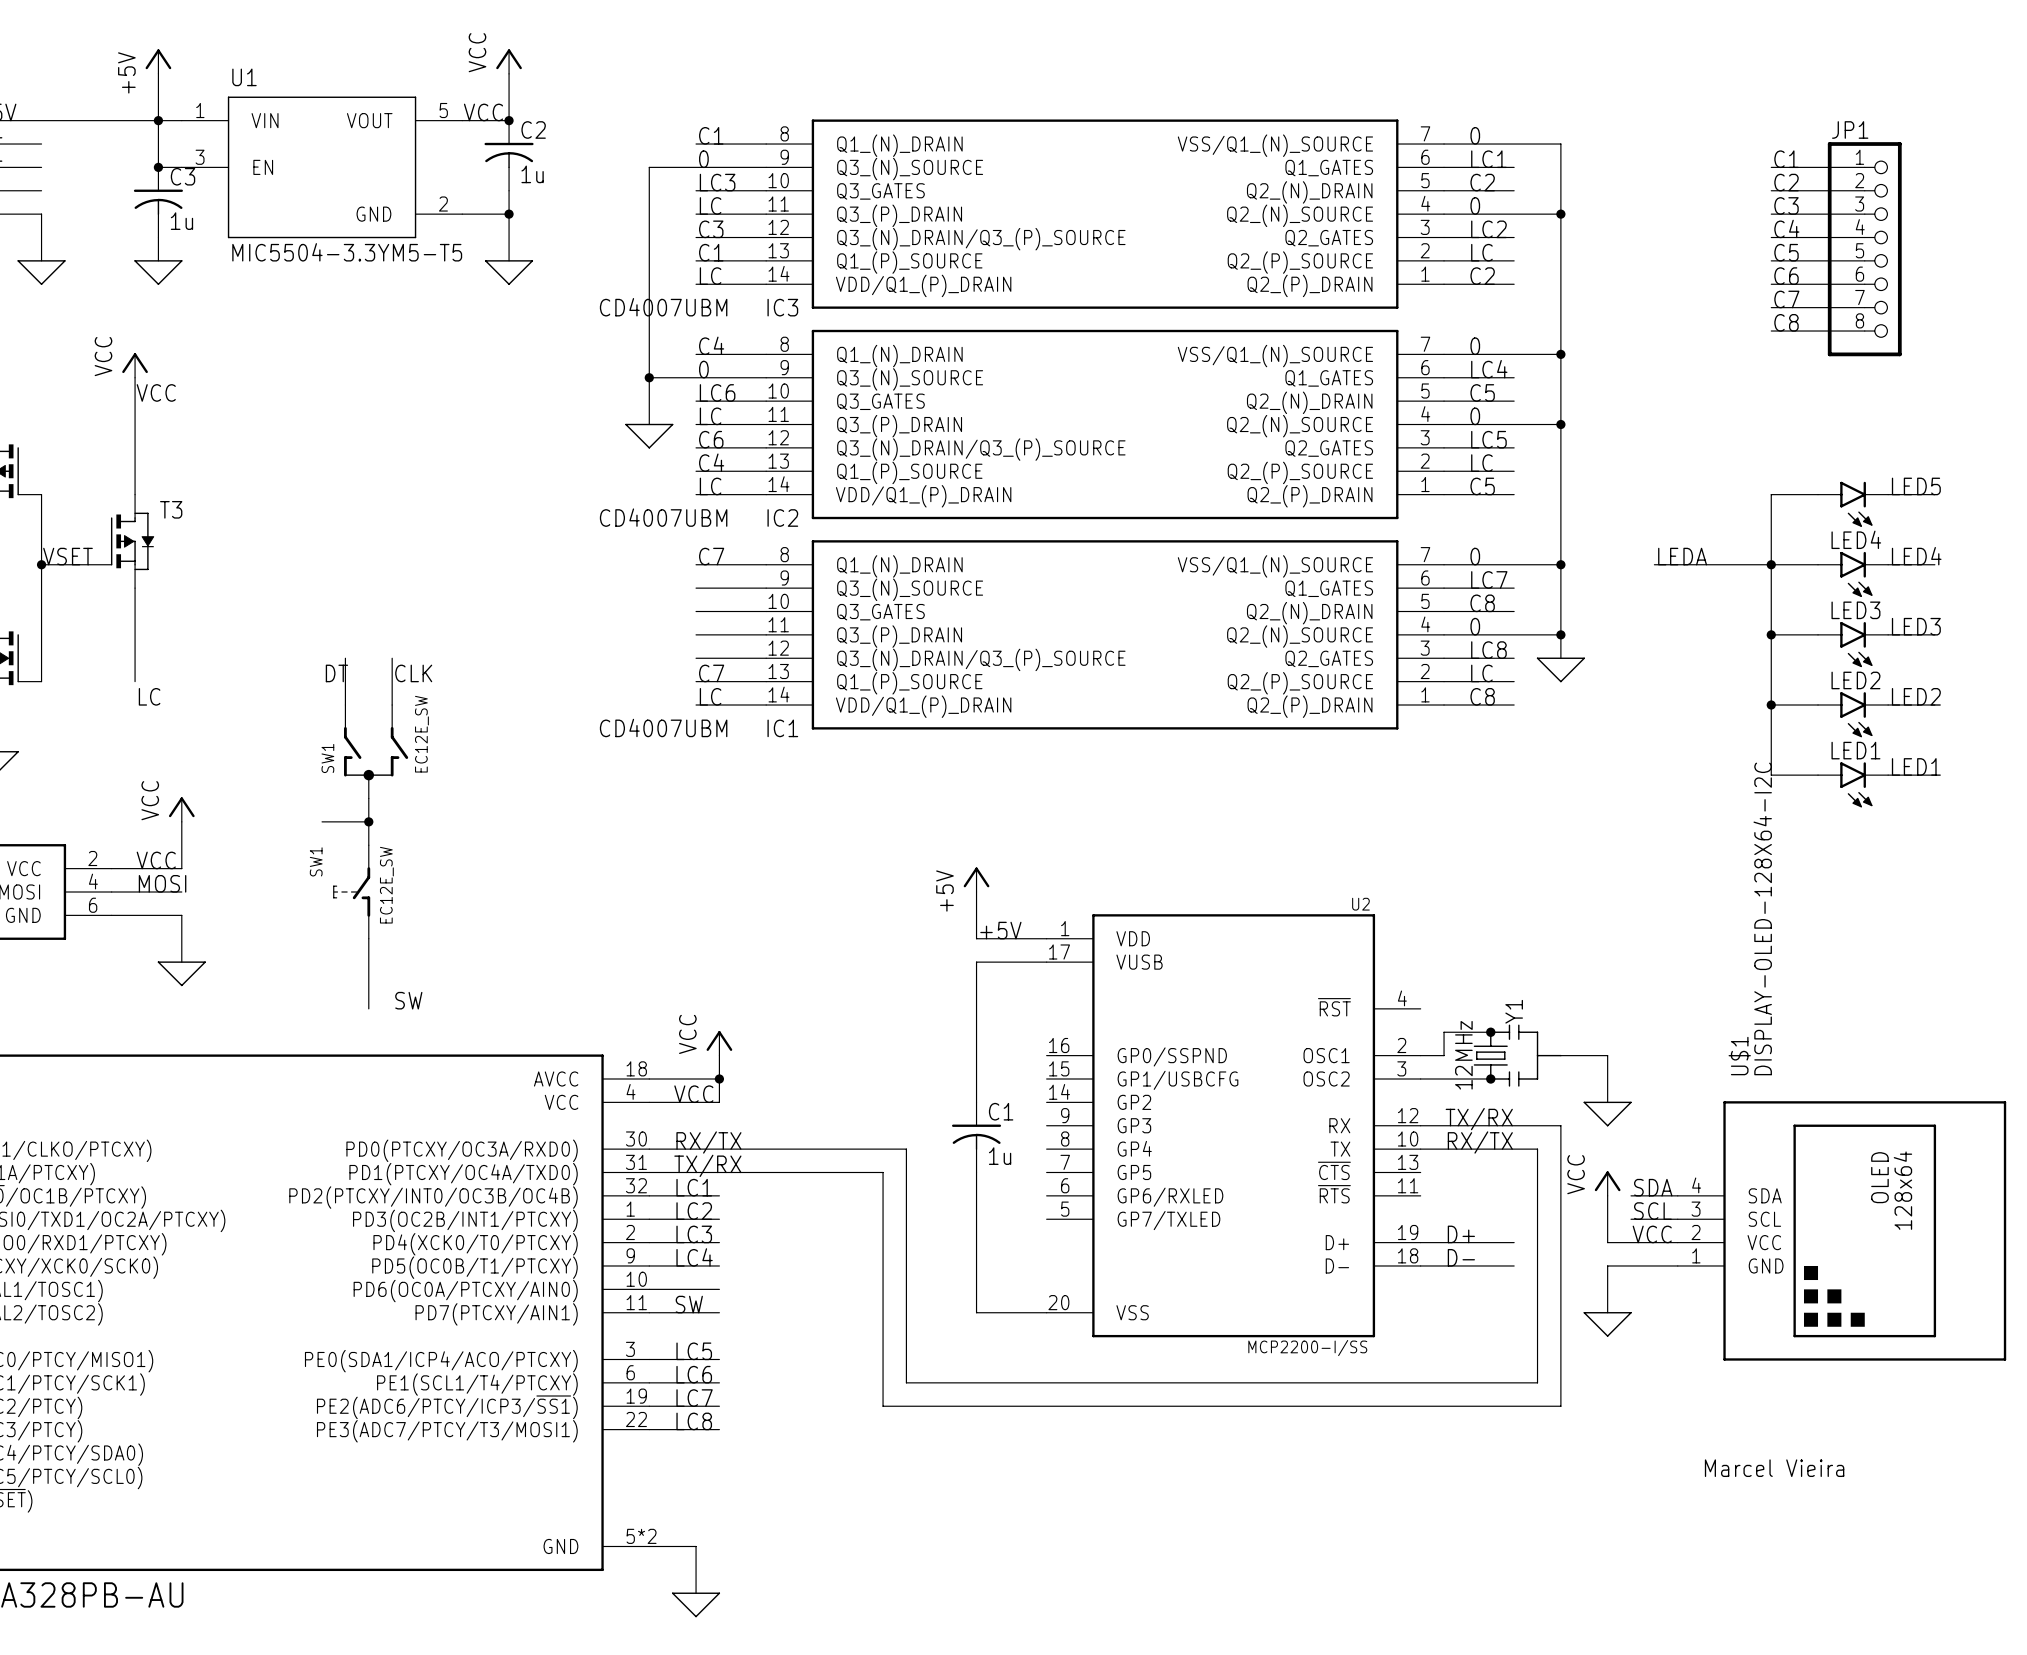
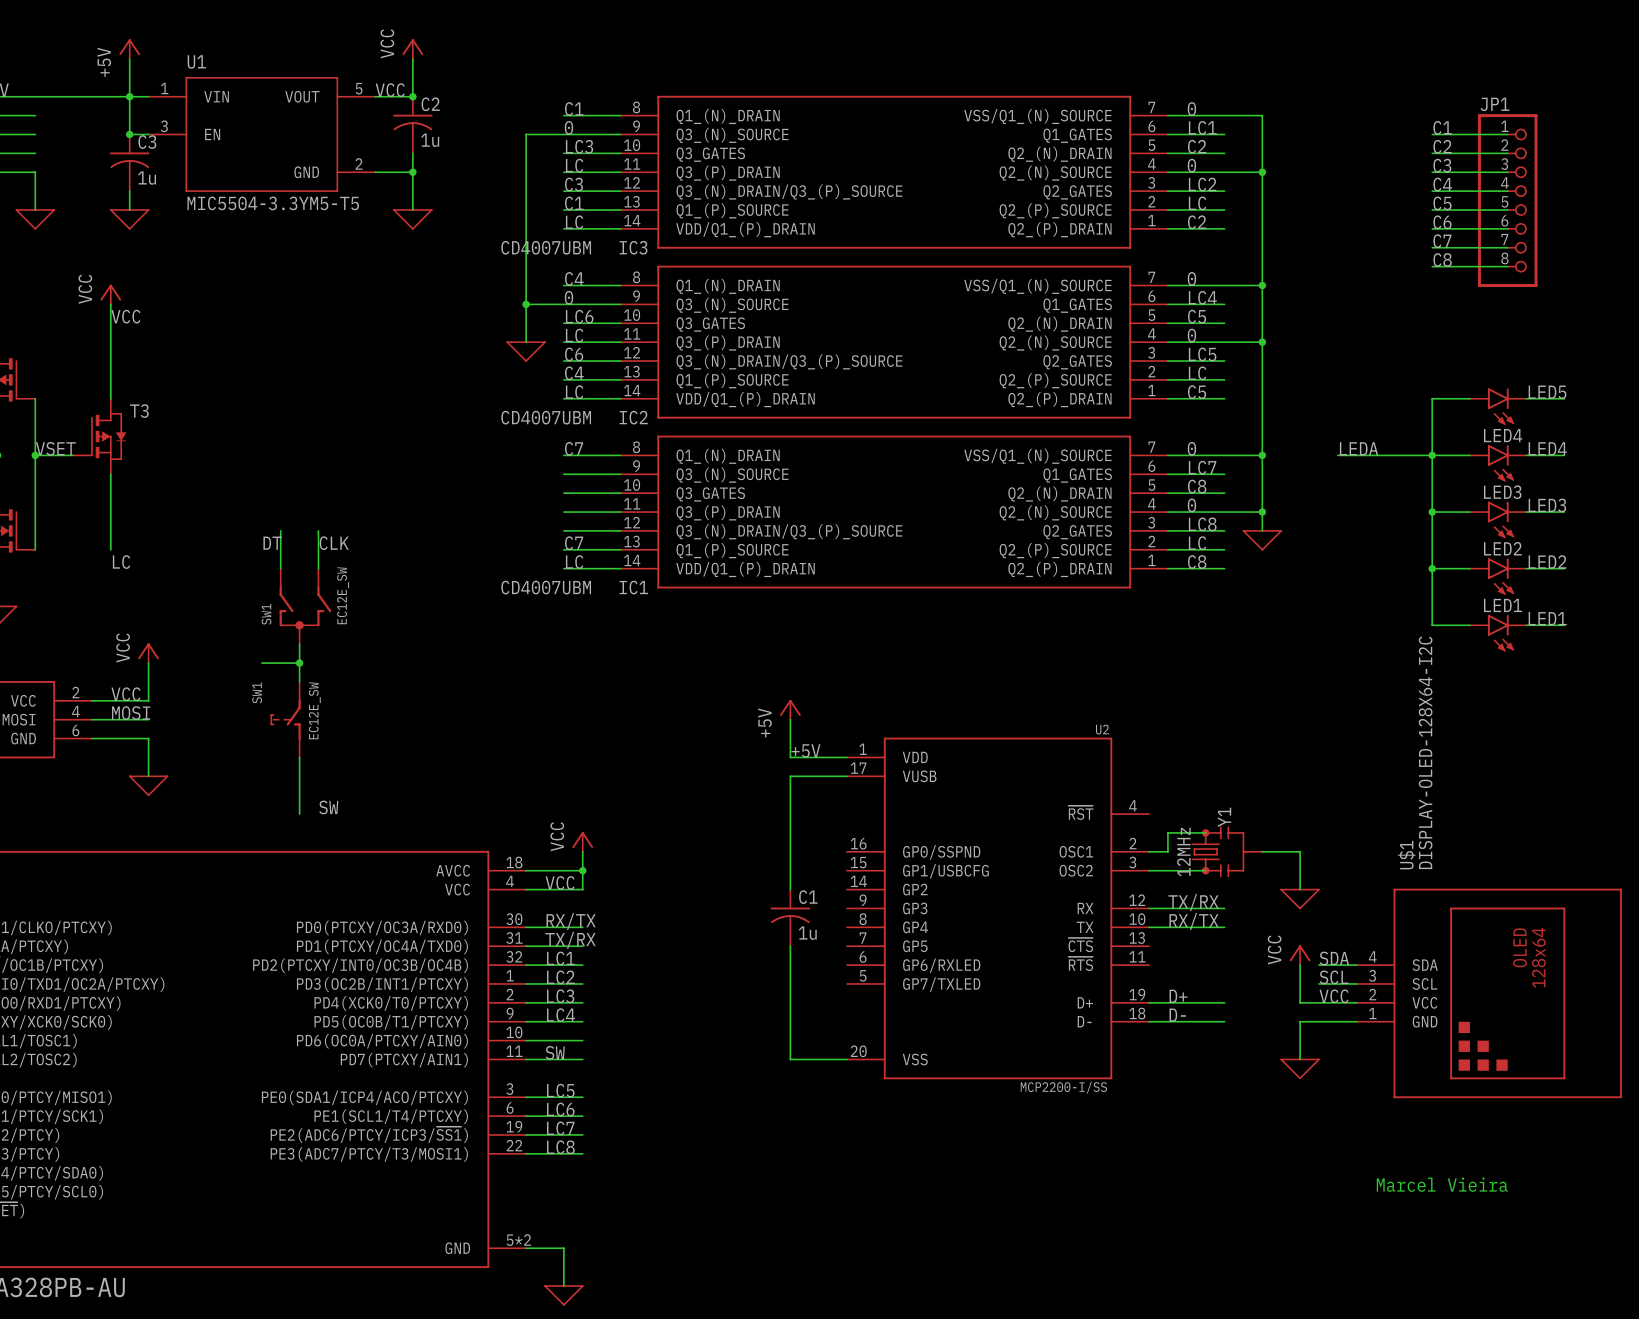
wire: (1514, 1125) (1560, 1125) (1560, 1406) (883, 1406) (883, 1172) (719, 1172) -> none
wire: (719, 1149) (906, 1149) (906, 1382) (1537, 1382) (1537, 1149) (1514, 1149) -> none

